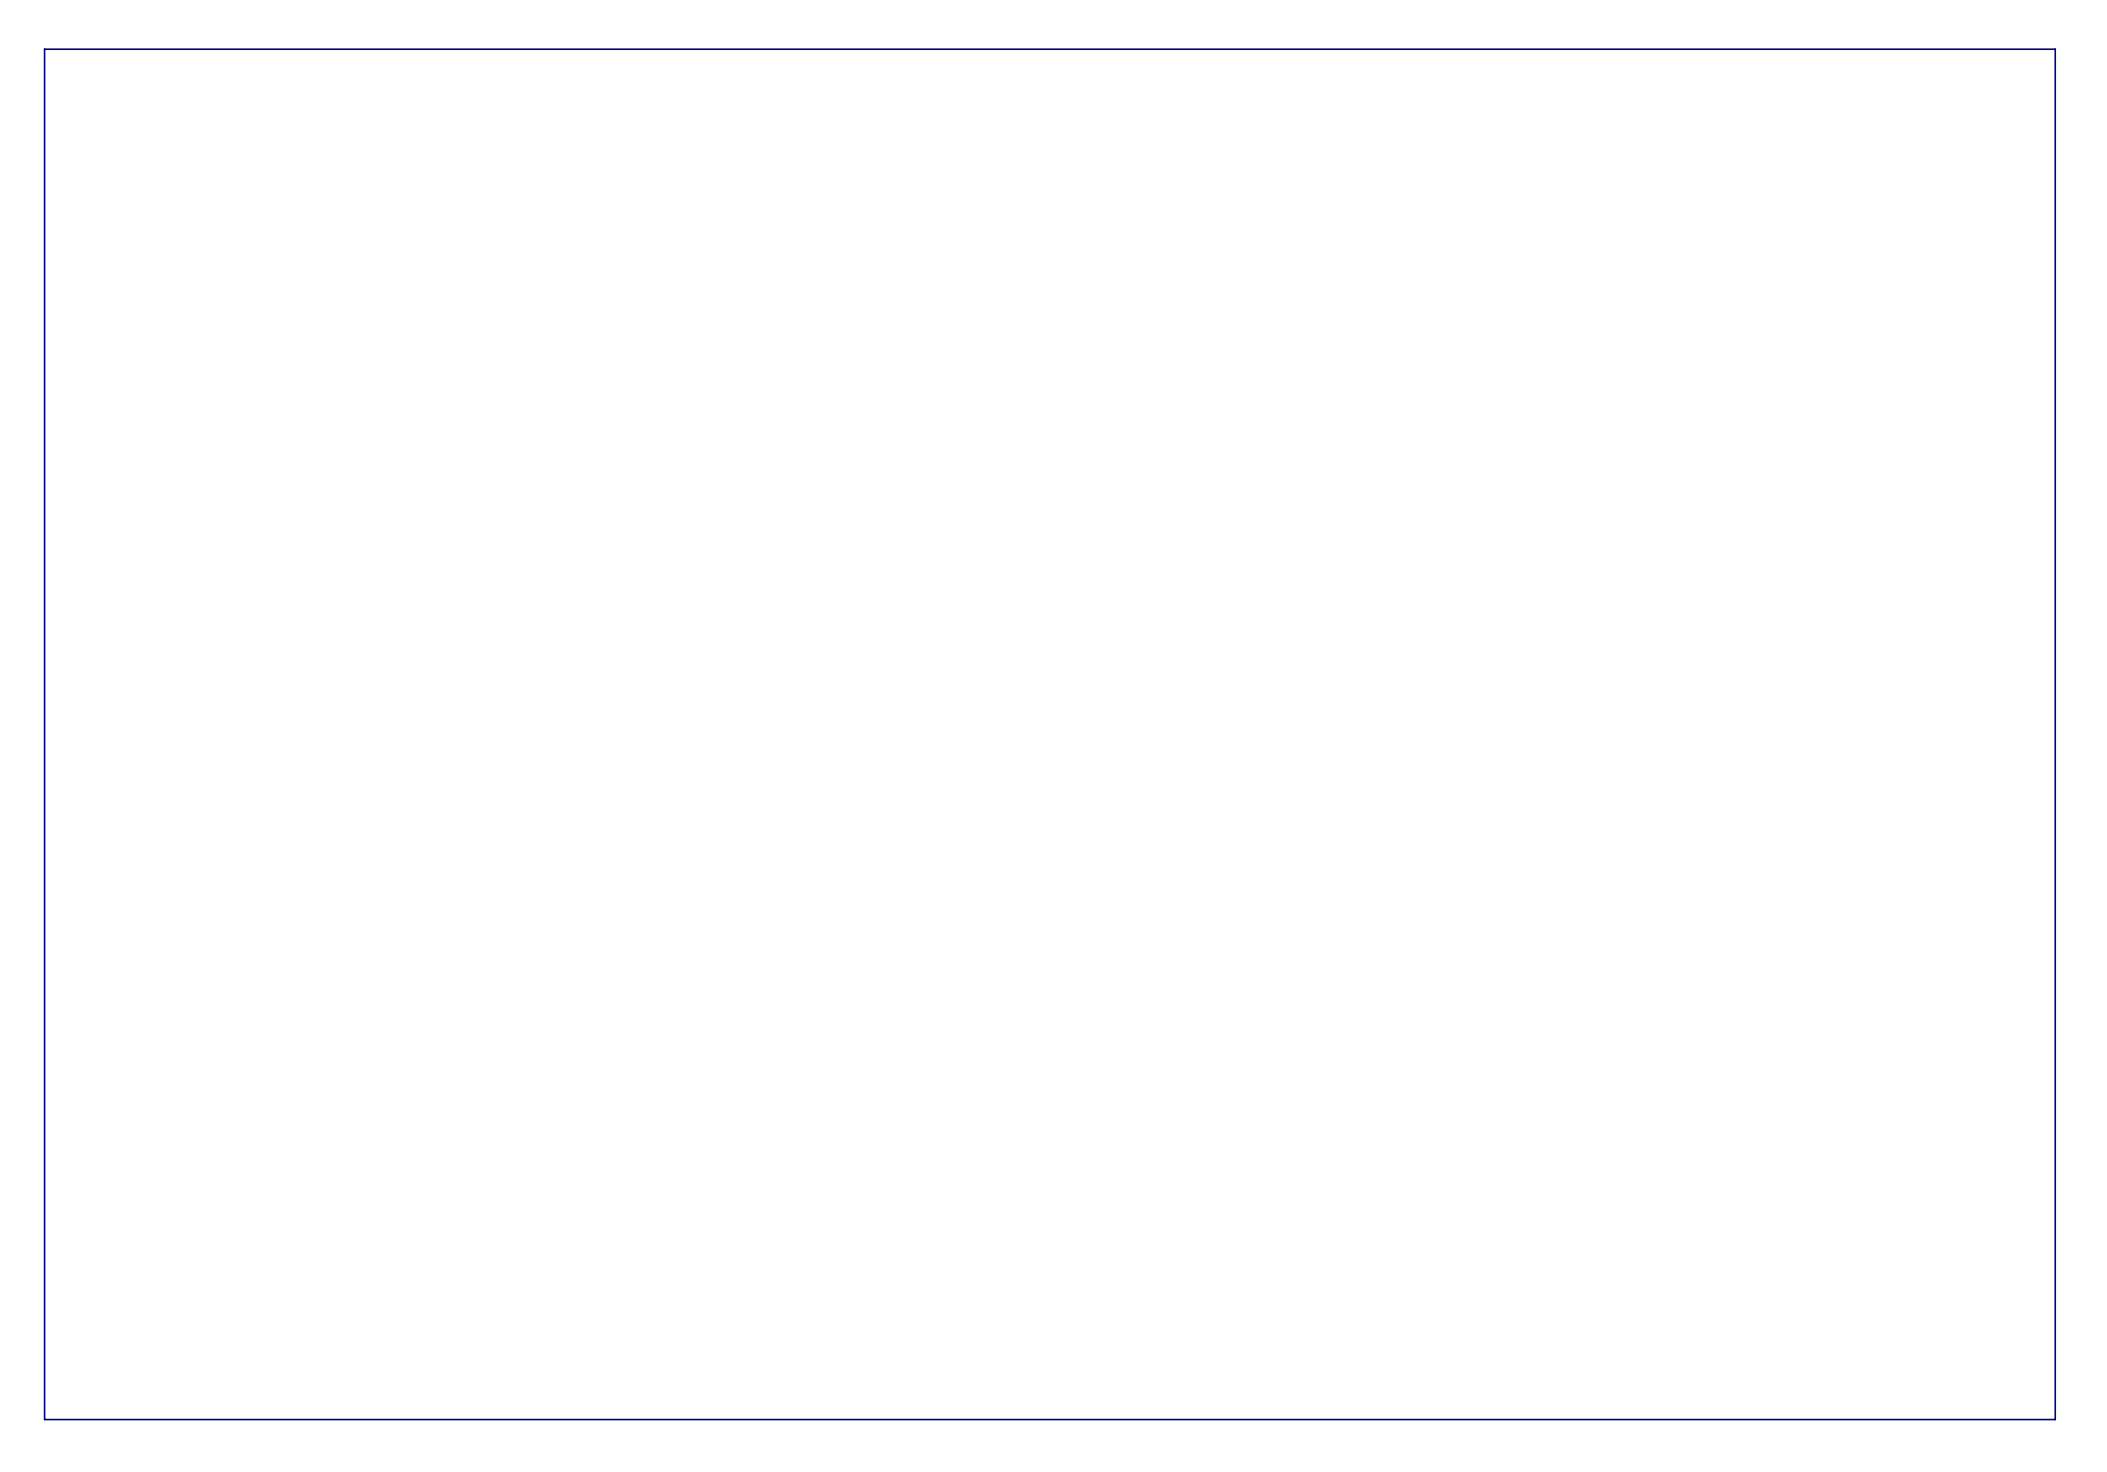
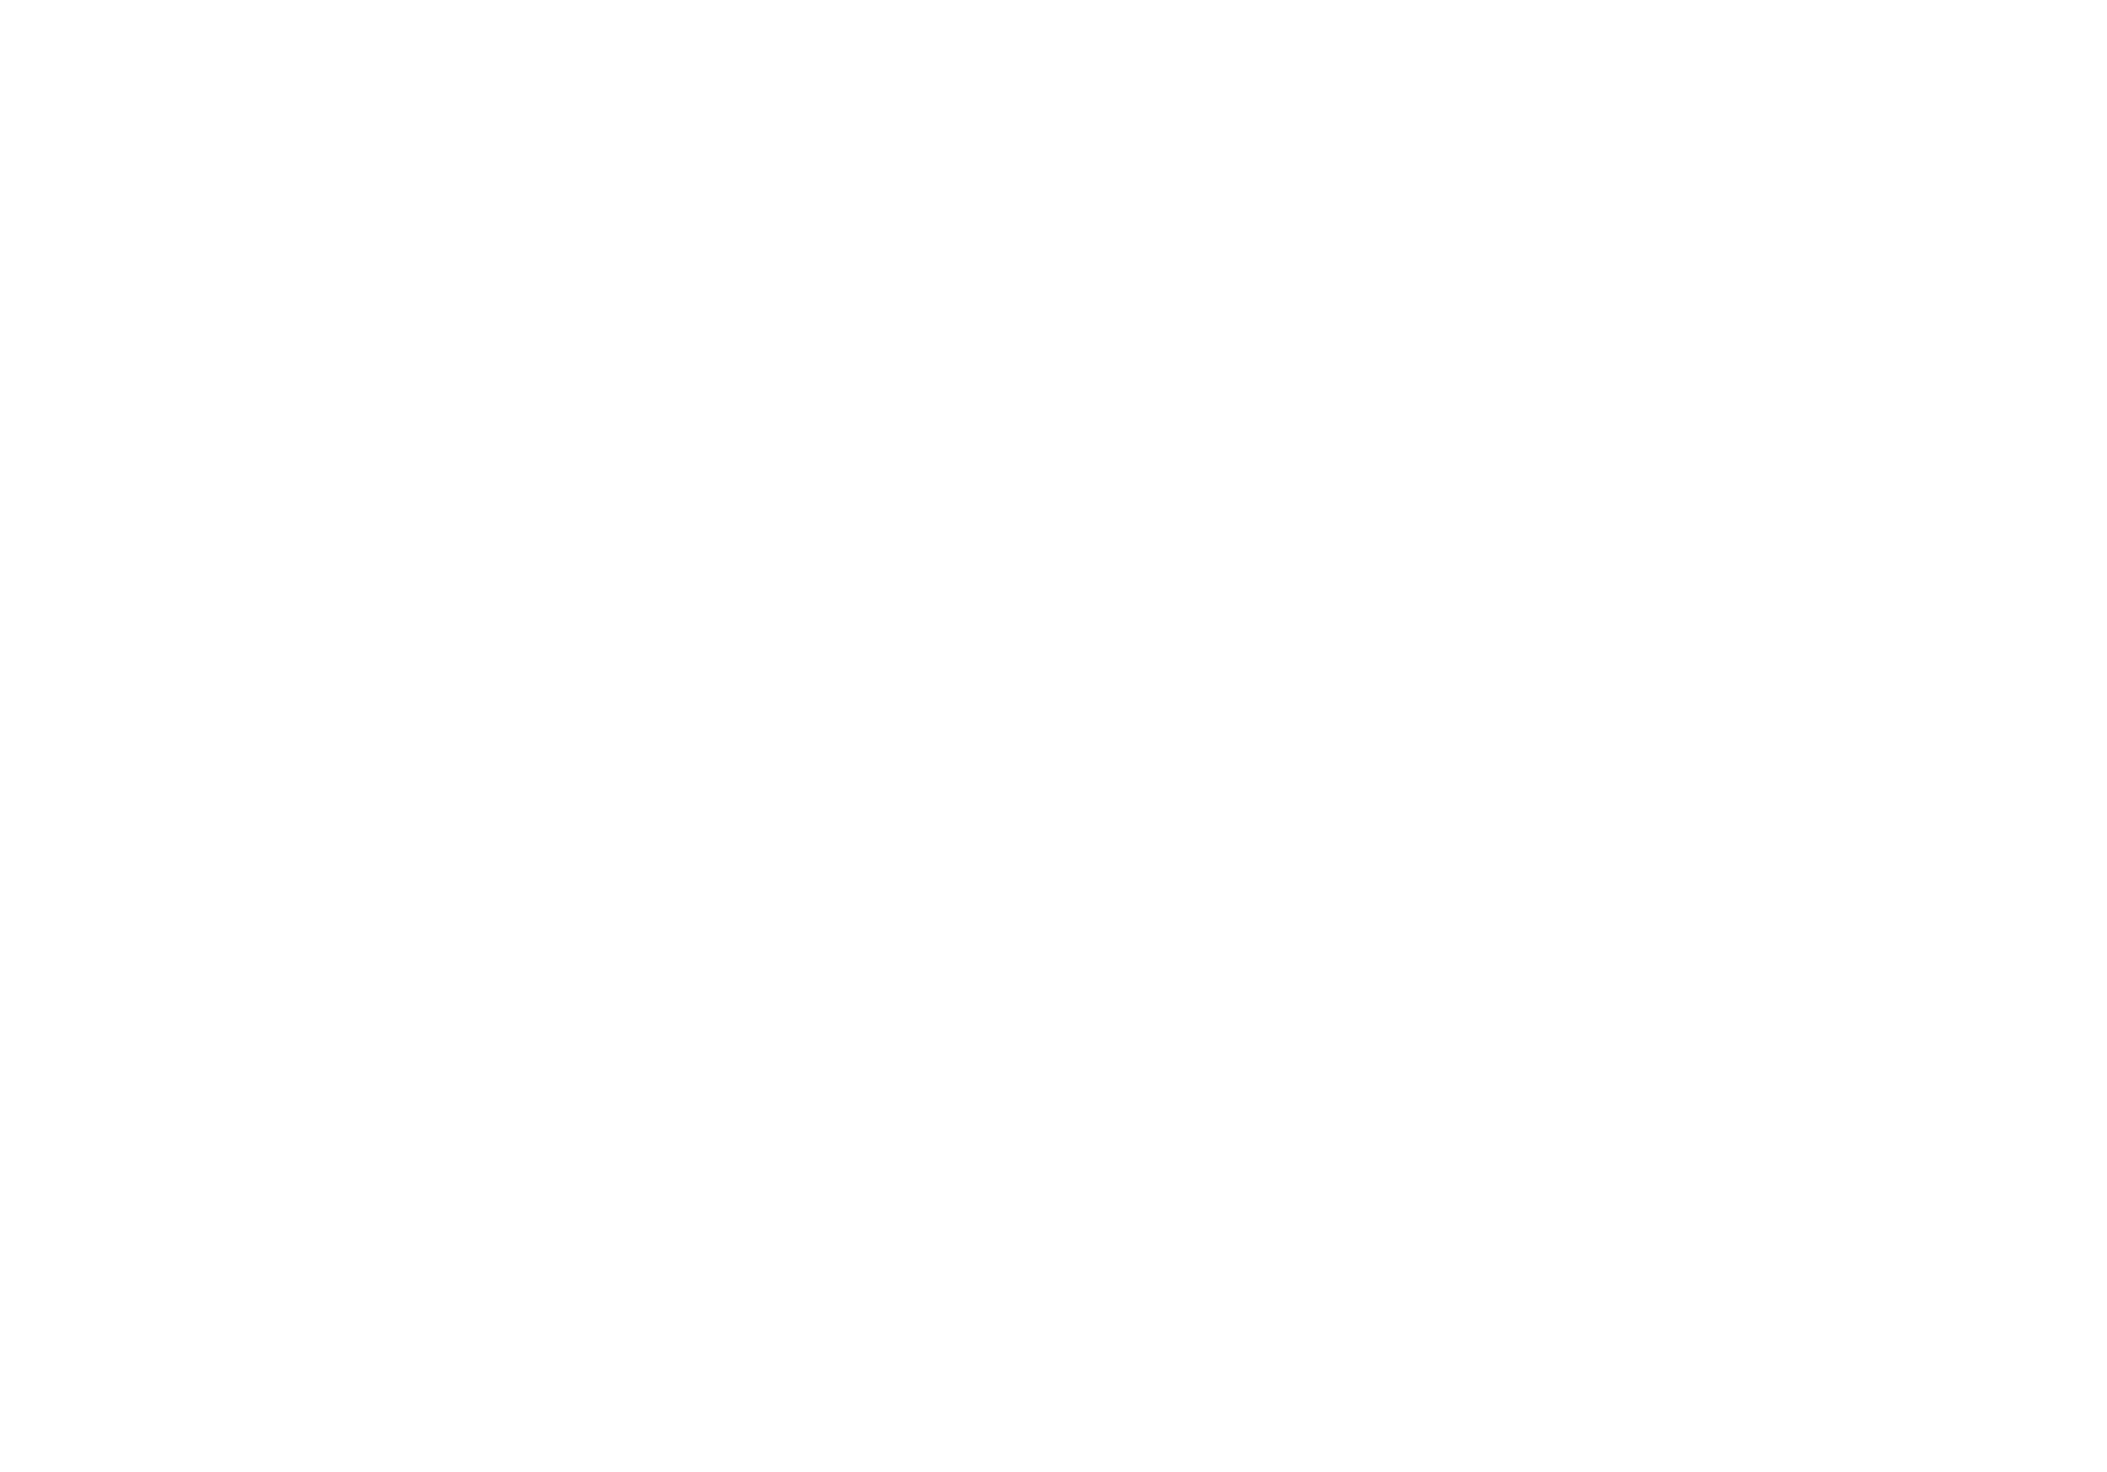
line: (44, 49) (2055, 49) (2055, 1419) (44, 1419) (44, 49) -> none

